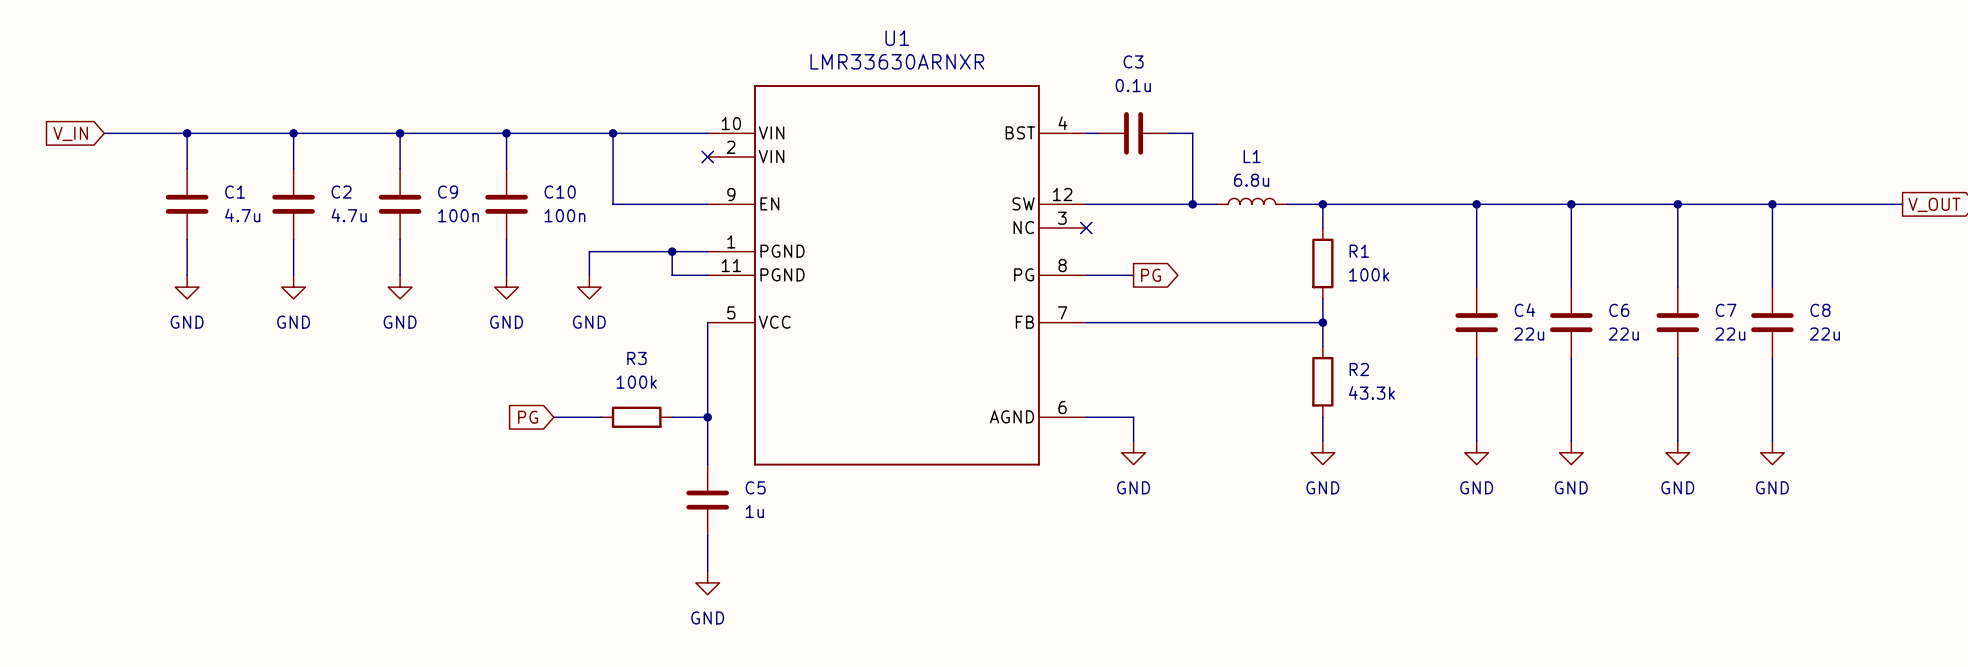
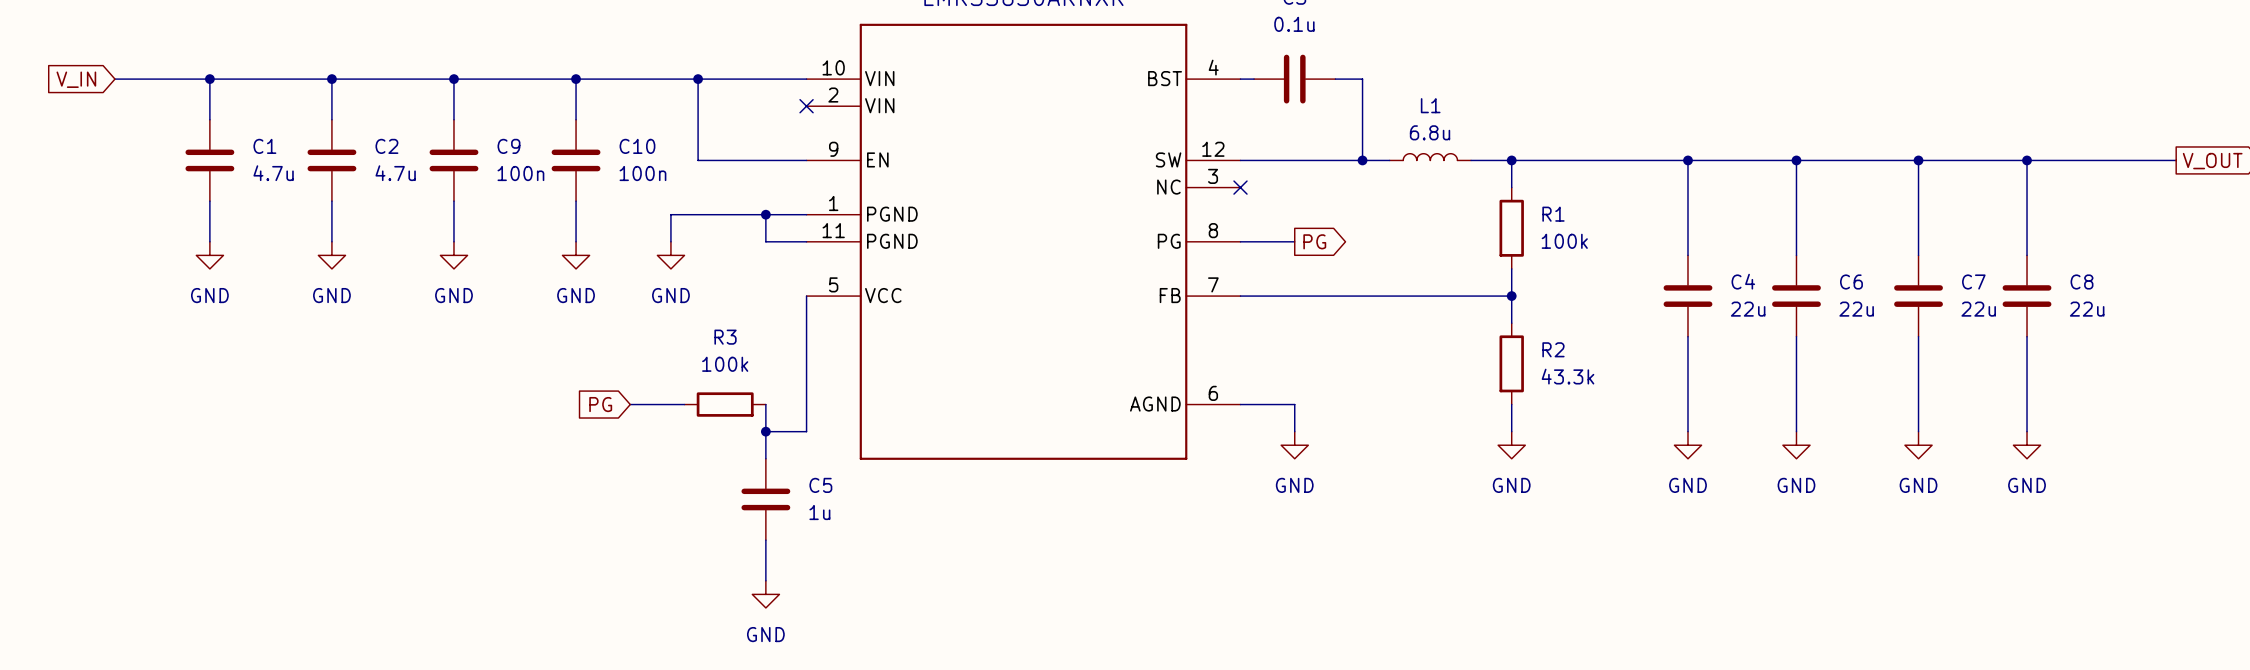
wire: (672, 417) (707, 417) -> (765, 404) (765, 458)
junction position: (707, 417) -> (765, 431)
wire: (707, 440) (707, 464) -> (806, 431) (765, 431)
C5 position: (707, 500) -> (765, 499)
wire: (707, 535) (707, 571) -> (765, 540) (765, 580)
power symbol position: GND (707, 582) -> GND (765, 594)

